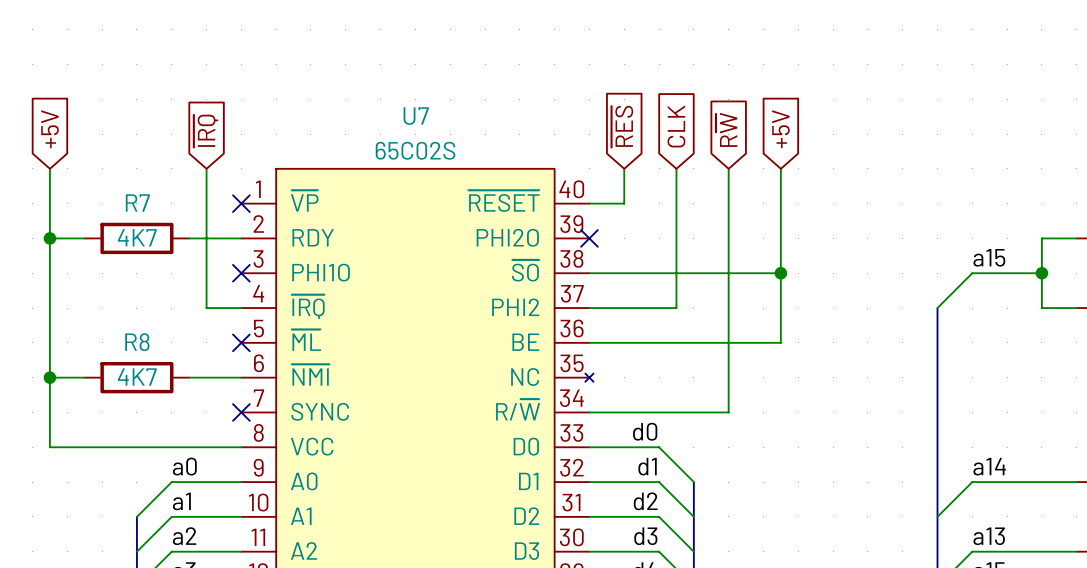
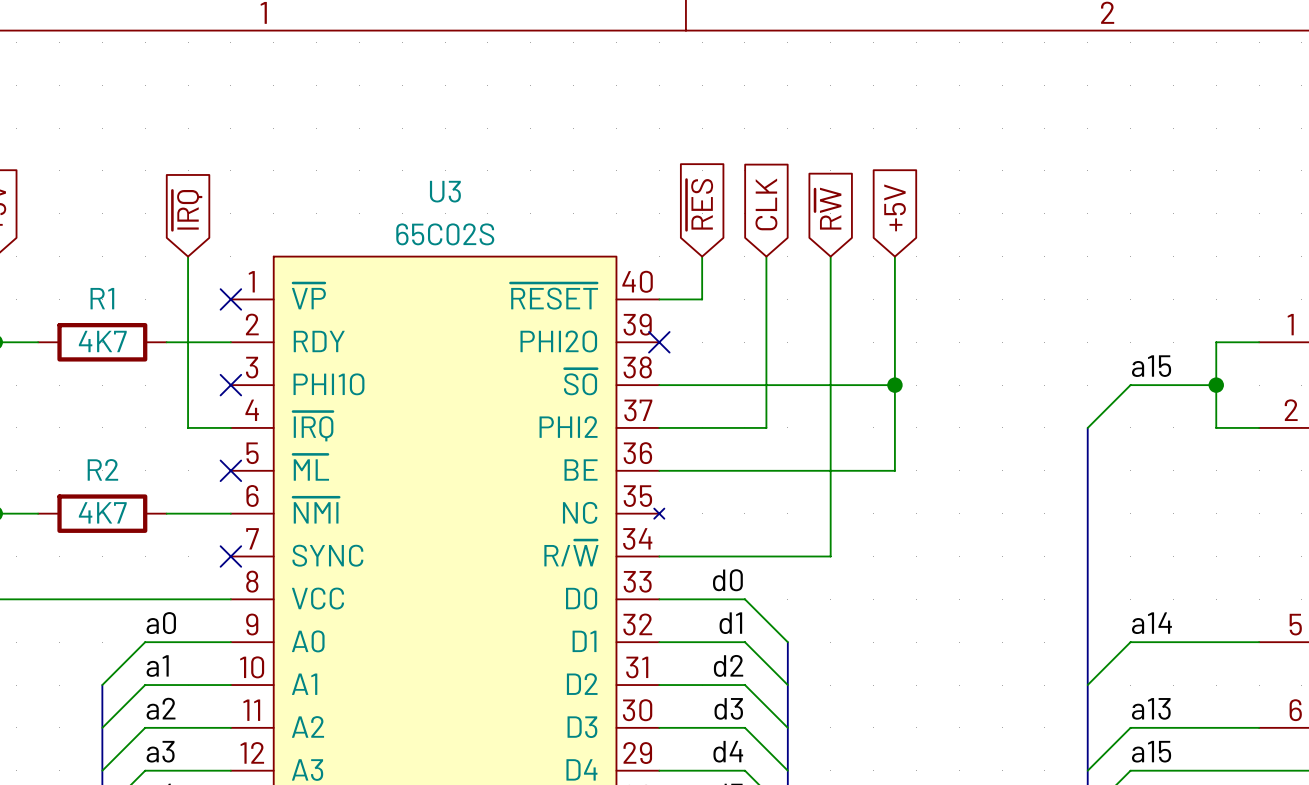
U7 name: U7 (416, 116) -> U3 (445, 191)
R7 name: R7 (137, 202) -> R1 (102, 298)
R8 name: R8 (137, 342) -> R2 (102, 469)

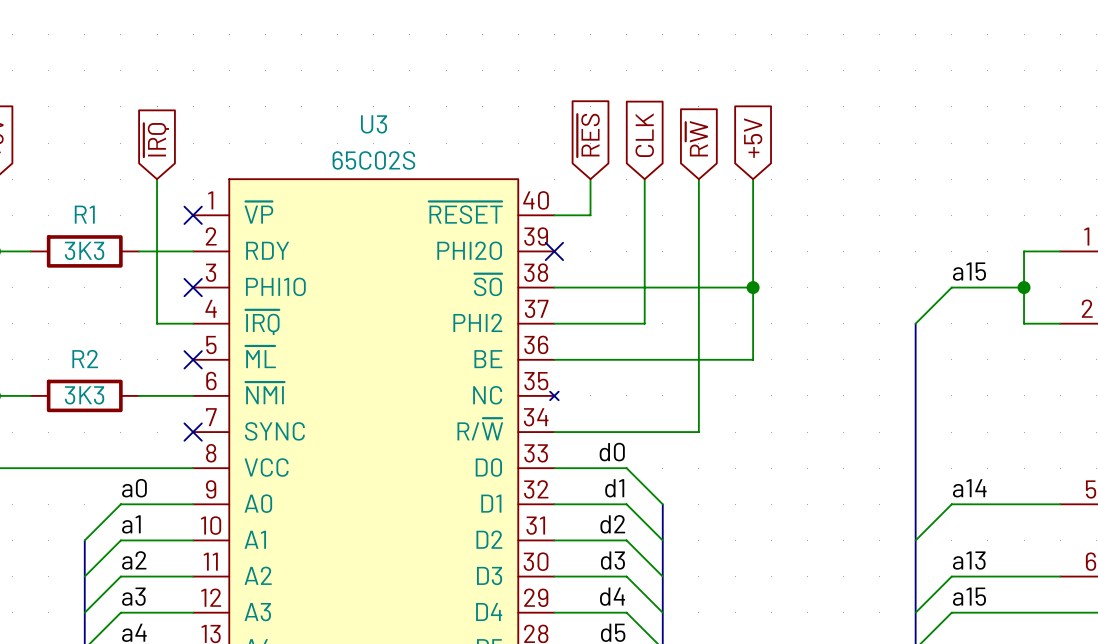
R1 value: 4K7 (102, 341) -> 3K3 (84, 250)
R2 value: 4K7 (102, 512) -> 3K3 (84, 395)

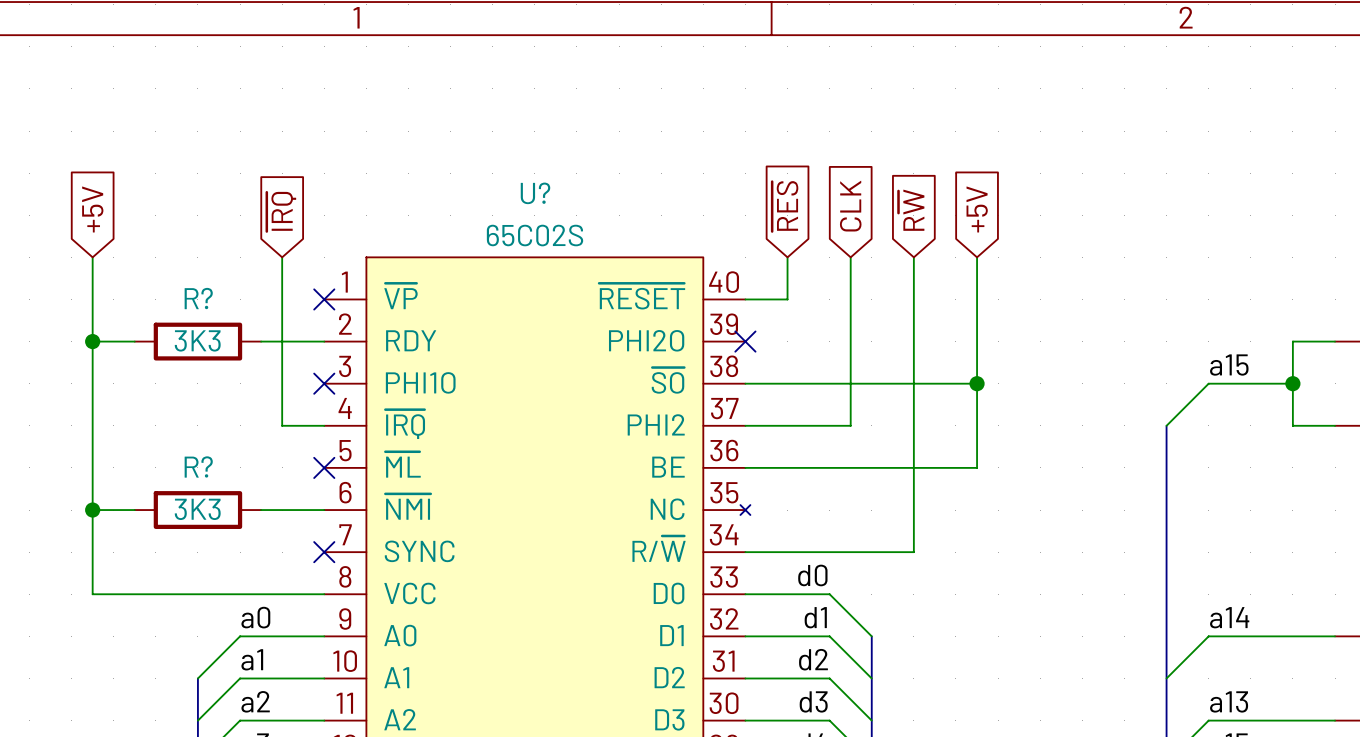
U3 name: U3 (374, 124) -> U? (535, 193)
R1 name: R1 (84, 214) -> R? (198, 298)
R2 name: R2 (85, 359) -> R? (198, 466)

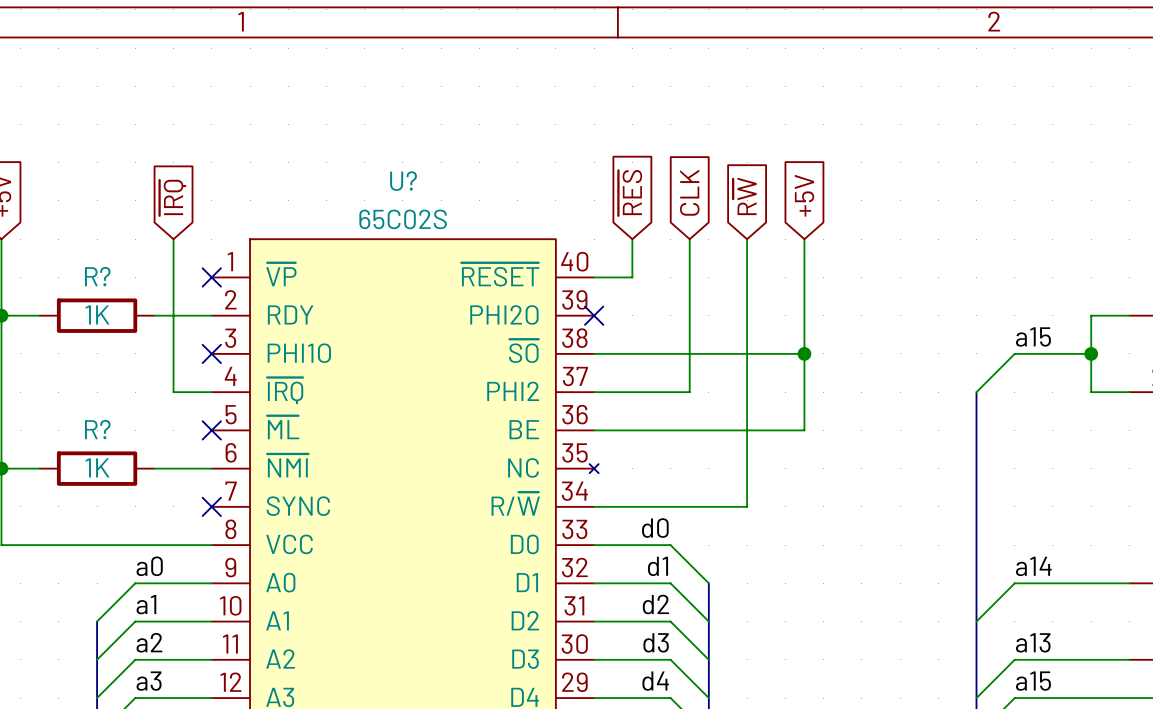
R? value: 3K3 (197, 340) -> 1K (97, 314)
R? value: 3K3 (197, 509) -> 1K (97, 467)

